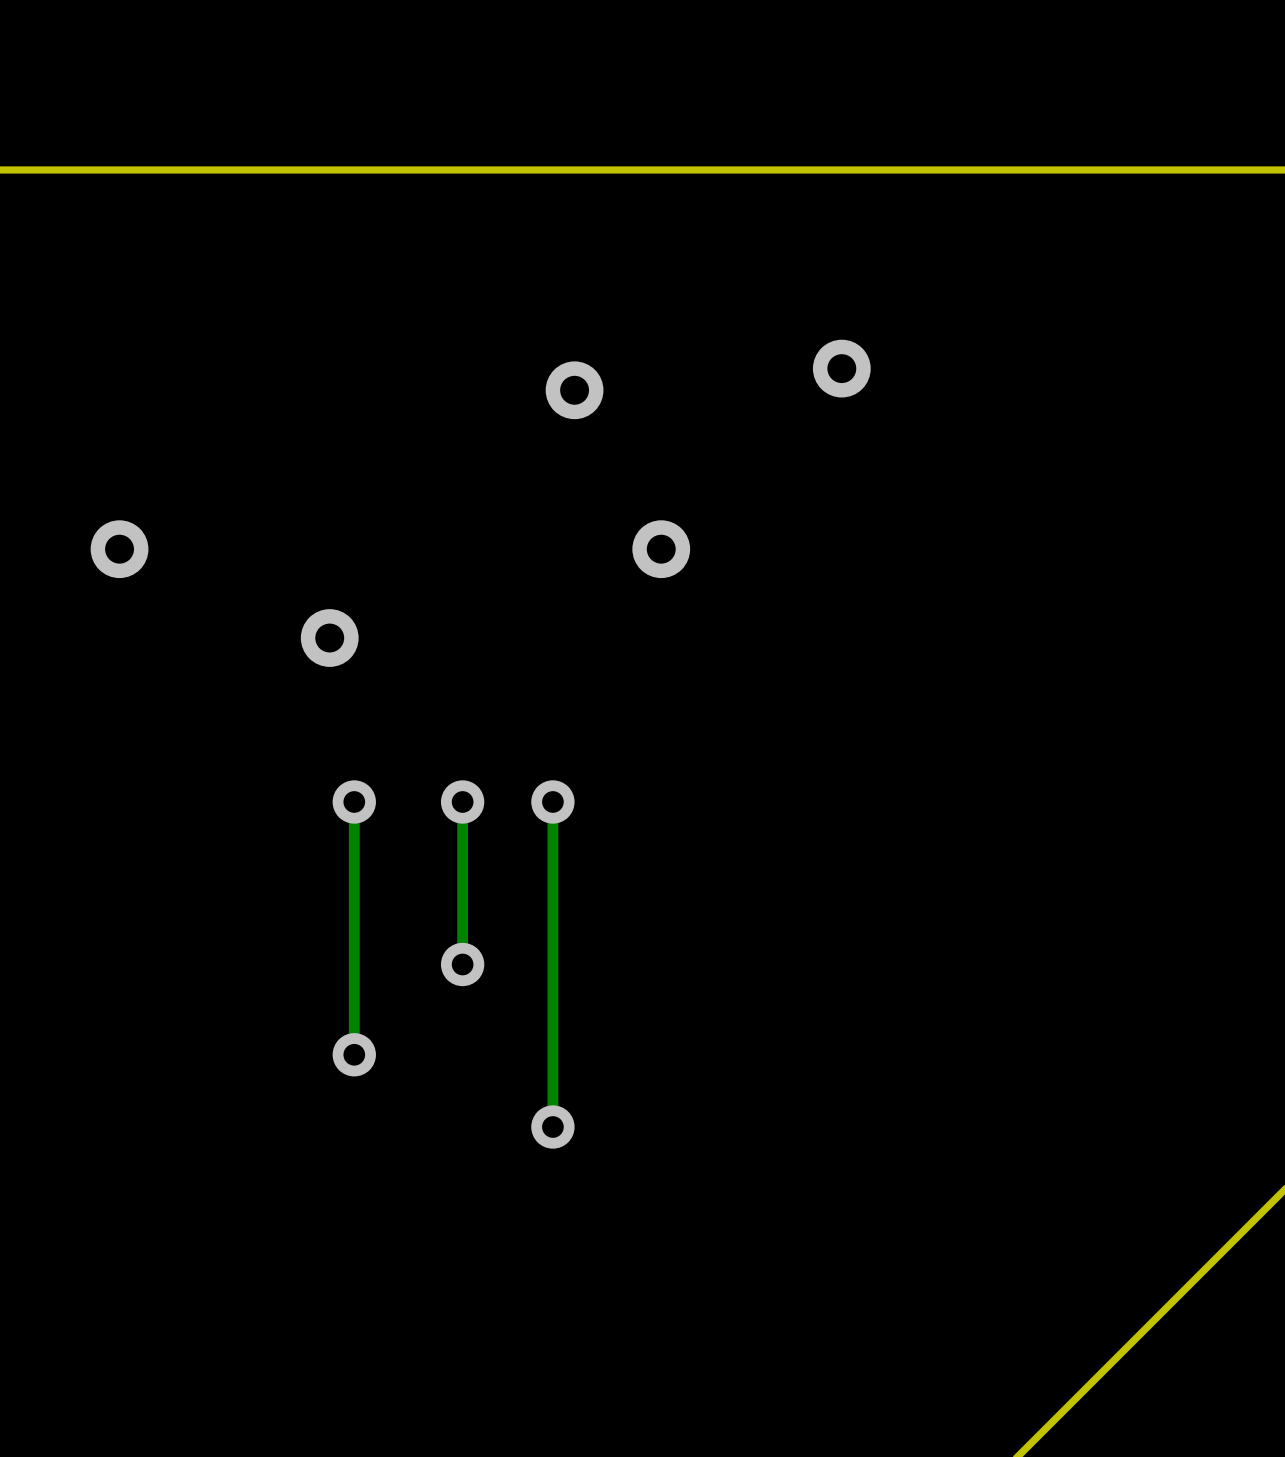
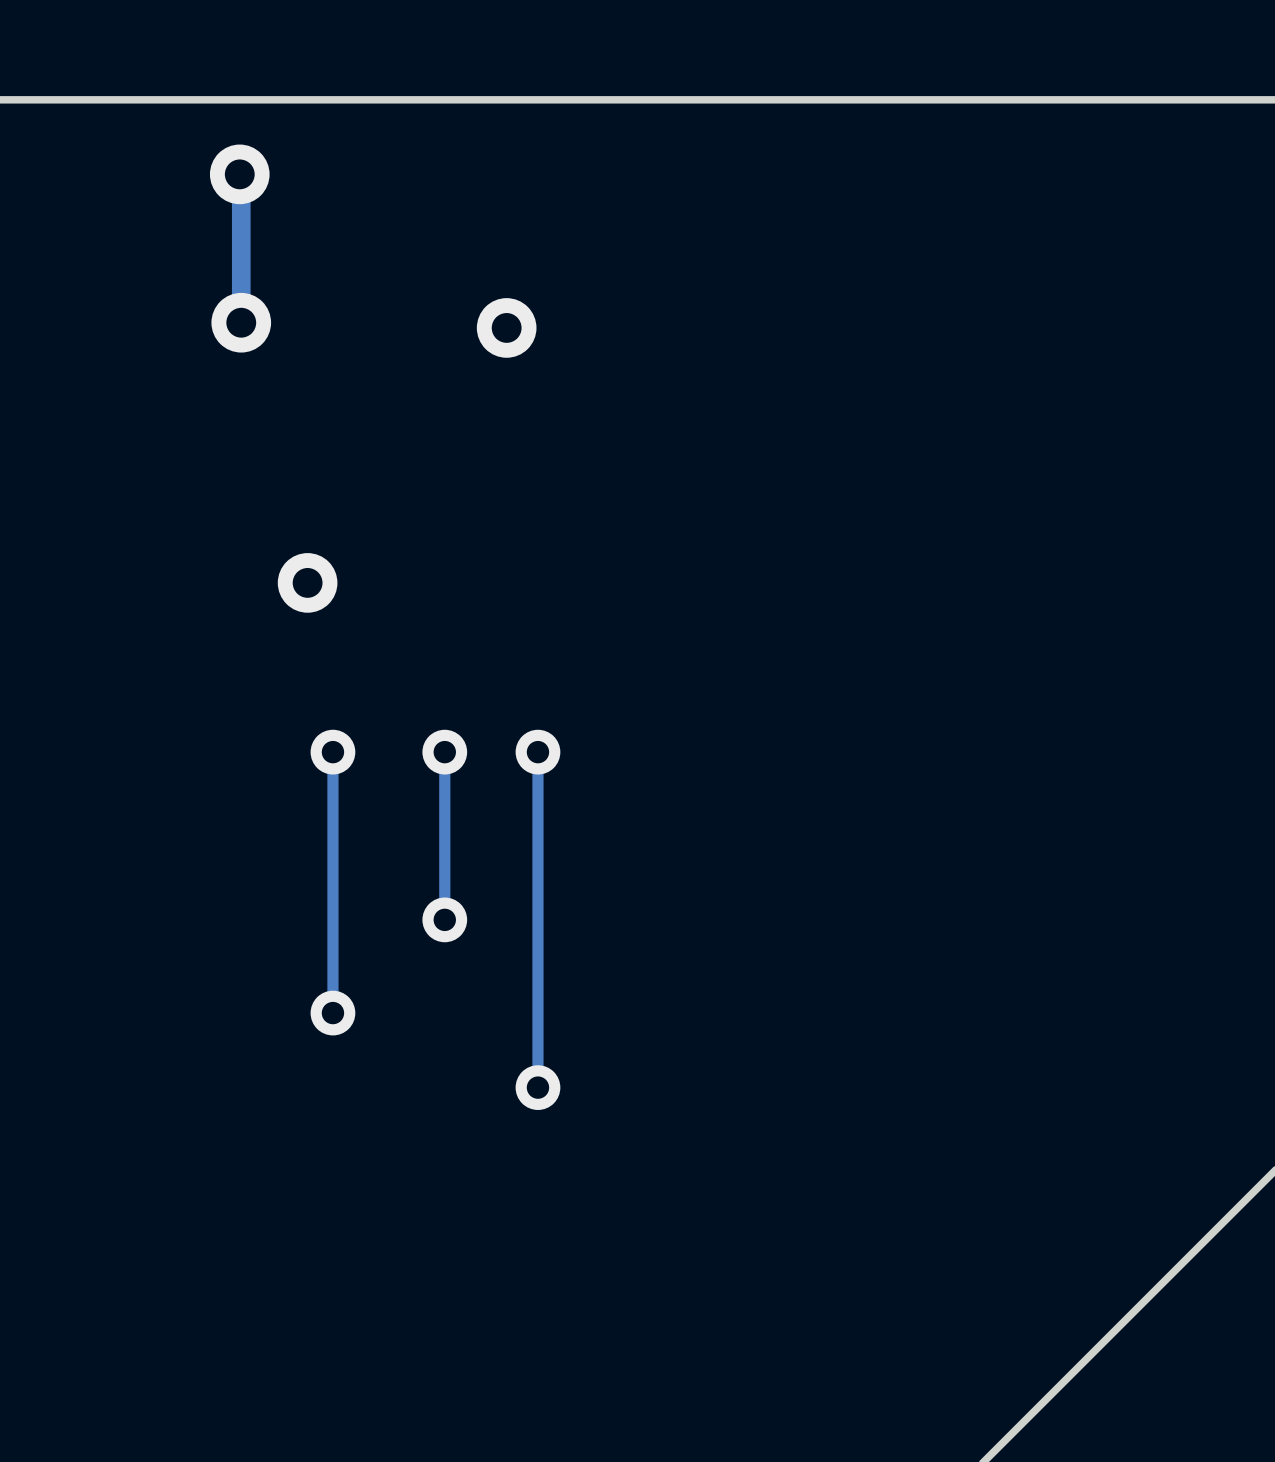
track: none -> (239, 174) (241, 322)
via: none -> (239, 174)
via: (841, 368) -> none
via: none -> (241, 322)
via position: (574, 390) -> (506, 327)
via: (119, 549) -> none
via: (661, 549) -> none

